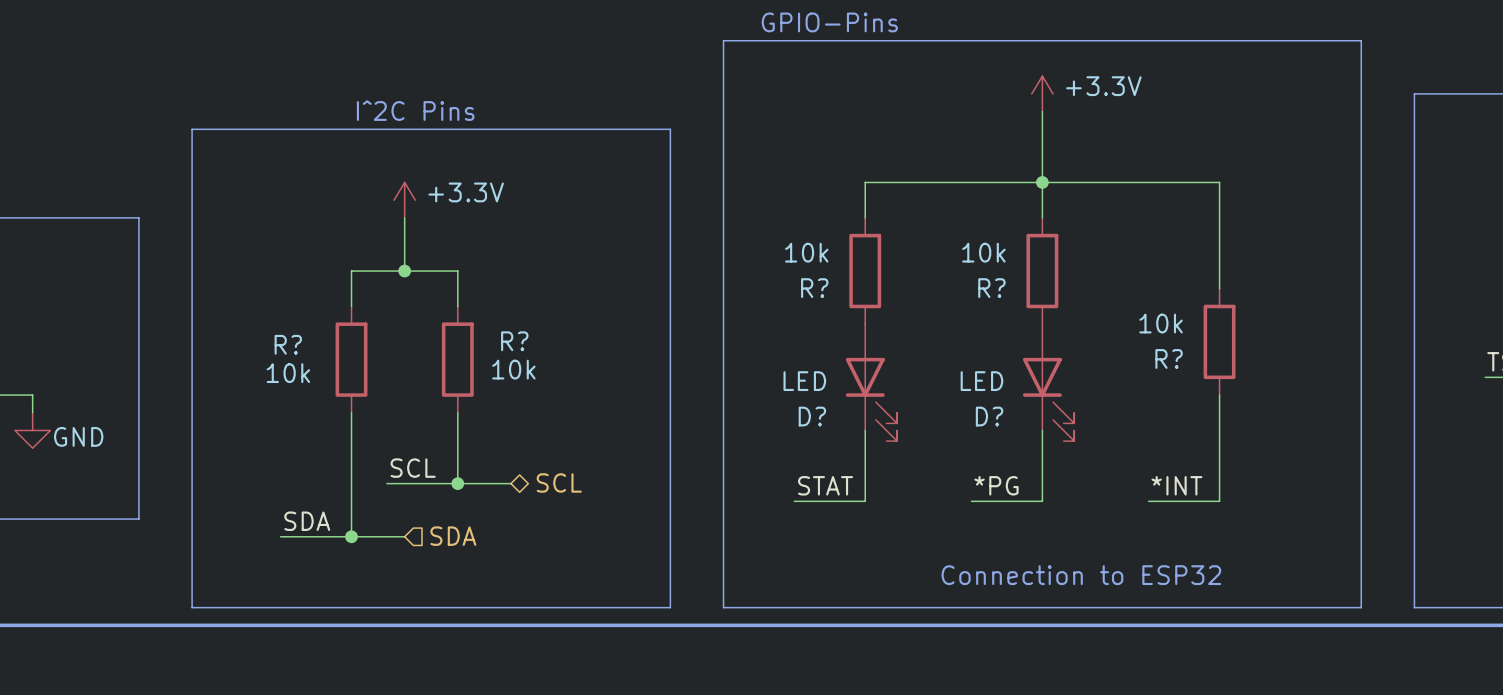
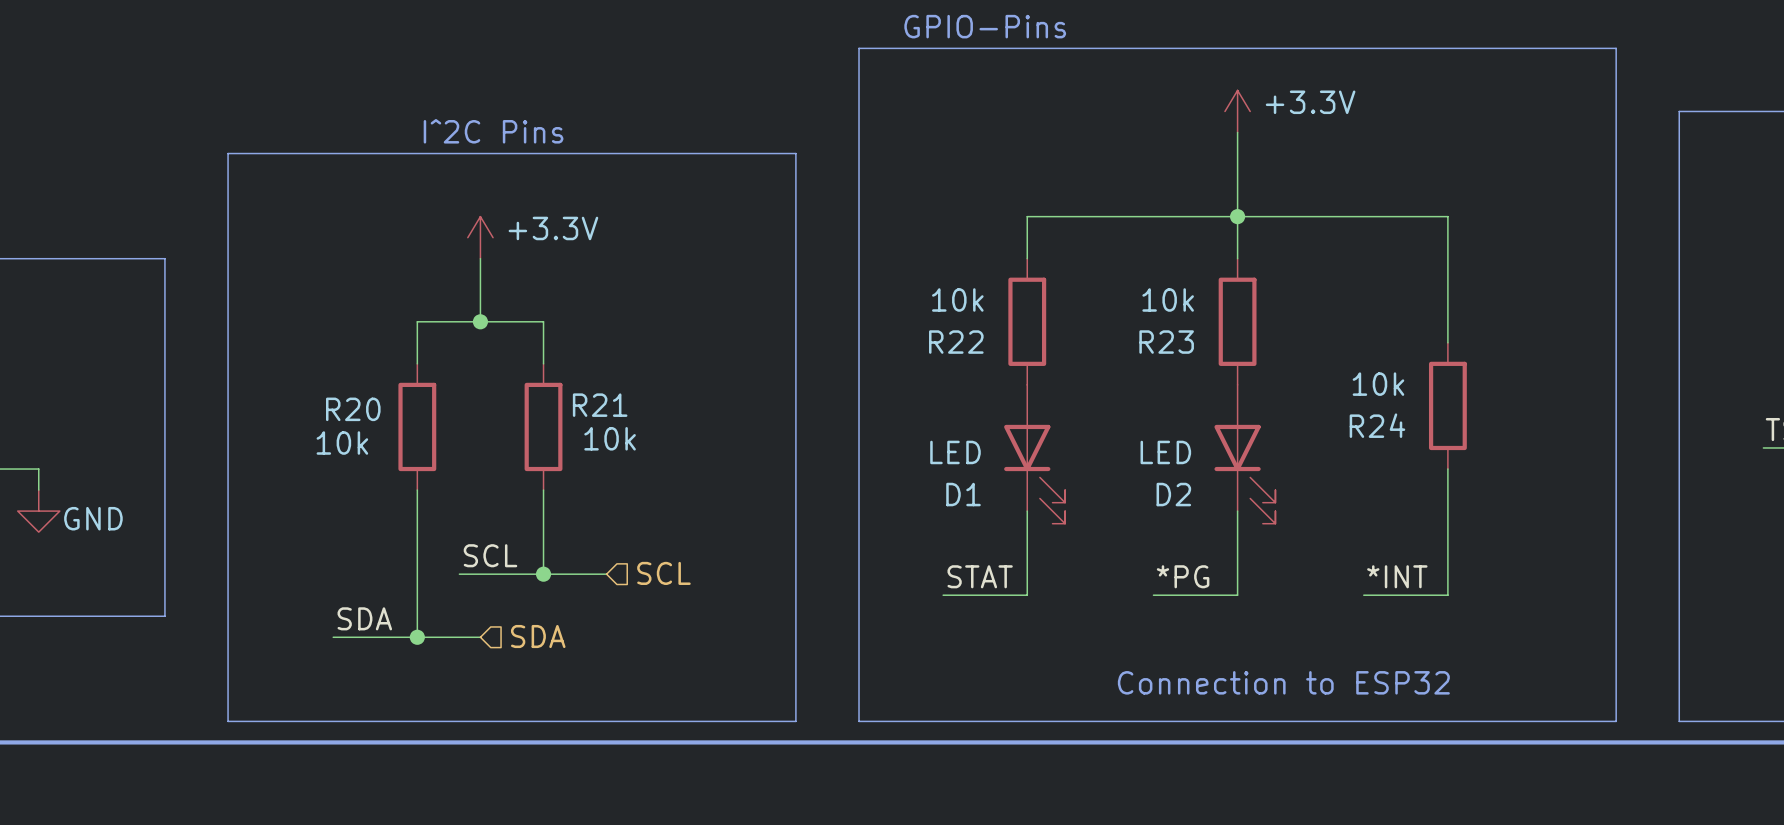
R? name: R? (814, 288) -> R22 (956, 342)
R? name: R? (991, 288) -> R23 (1166, 342)
R? name: R? (514, 341) -> R21 (600, 405)
R? name: R? (288, 344) -> R20 (353, 409)
R? name: R? (1169, 358) -> R24 (1377, 425)
D? name: D? (812, 416) -> D1 (963, 494)
D? name: D? (989, 416) -> D2 (1173, 494)
hierarchical label shape: bidirectional (559, 482) -> input (663, 573)

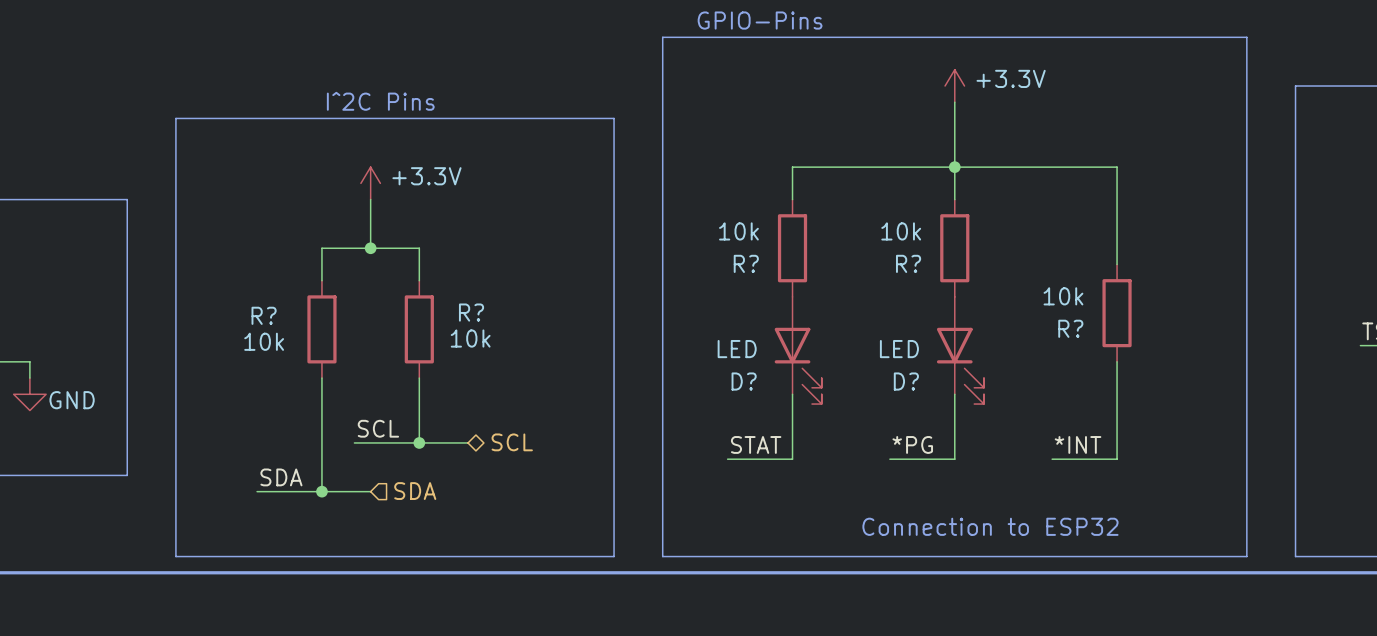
R22 name: R22 (956, 342) -> R? (746, 263)
R23 name: R23 (1166, 342) -> R? (908, 263)
R21 name: R21 (600, 405) -> R? (471, 312)
R20 name: R20 (353, 409) -> R? (264, 315)
R24 name: R24 (1377, 425) -> R? (1070, 328)
D1 name: D1 (963, 494) -> D? (744, 381)
D2 name: D2 (1173, 494) -> D? (906, 381)
hierarchical label shape: input (663, 573) -> bidirectional (512, 442)

